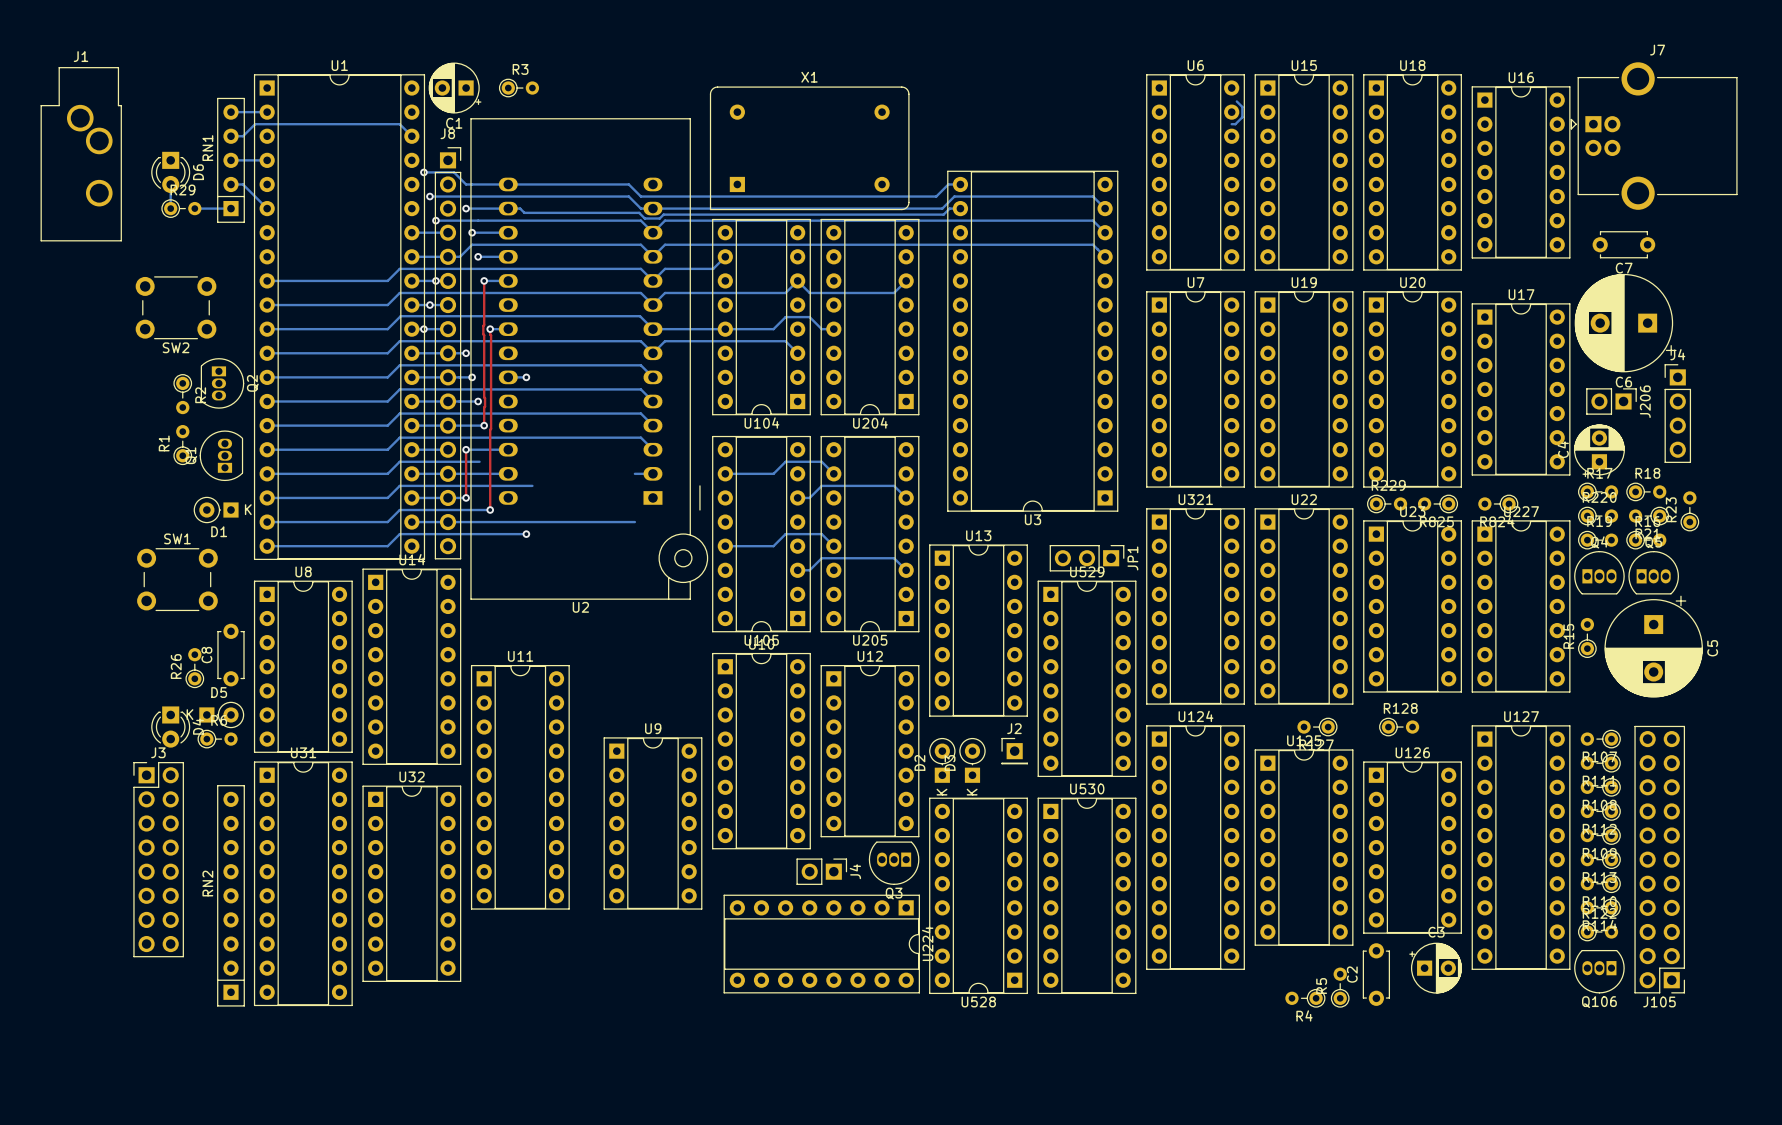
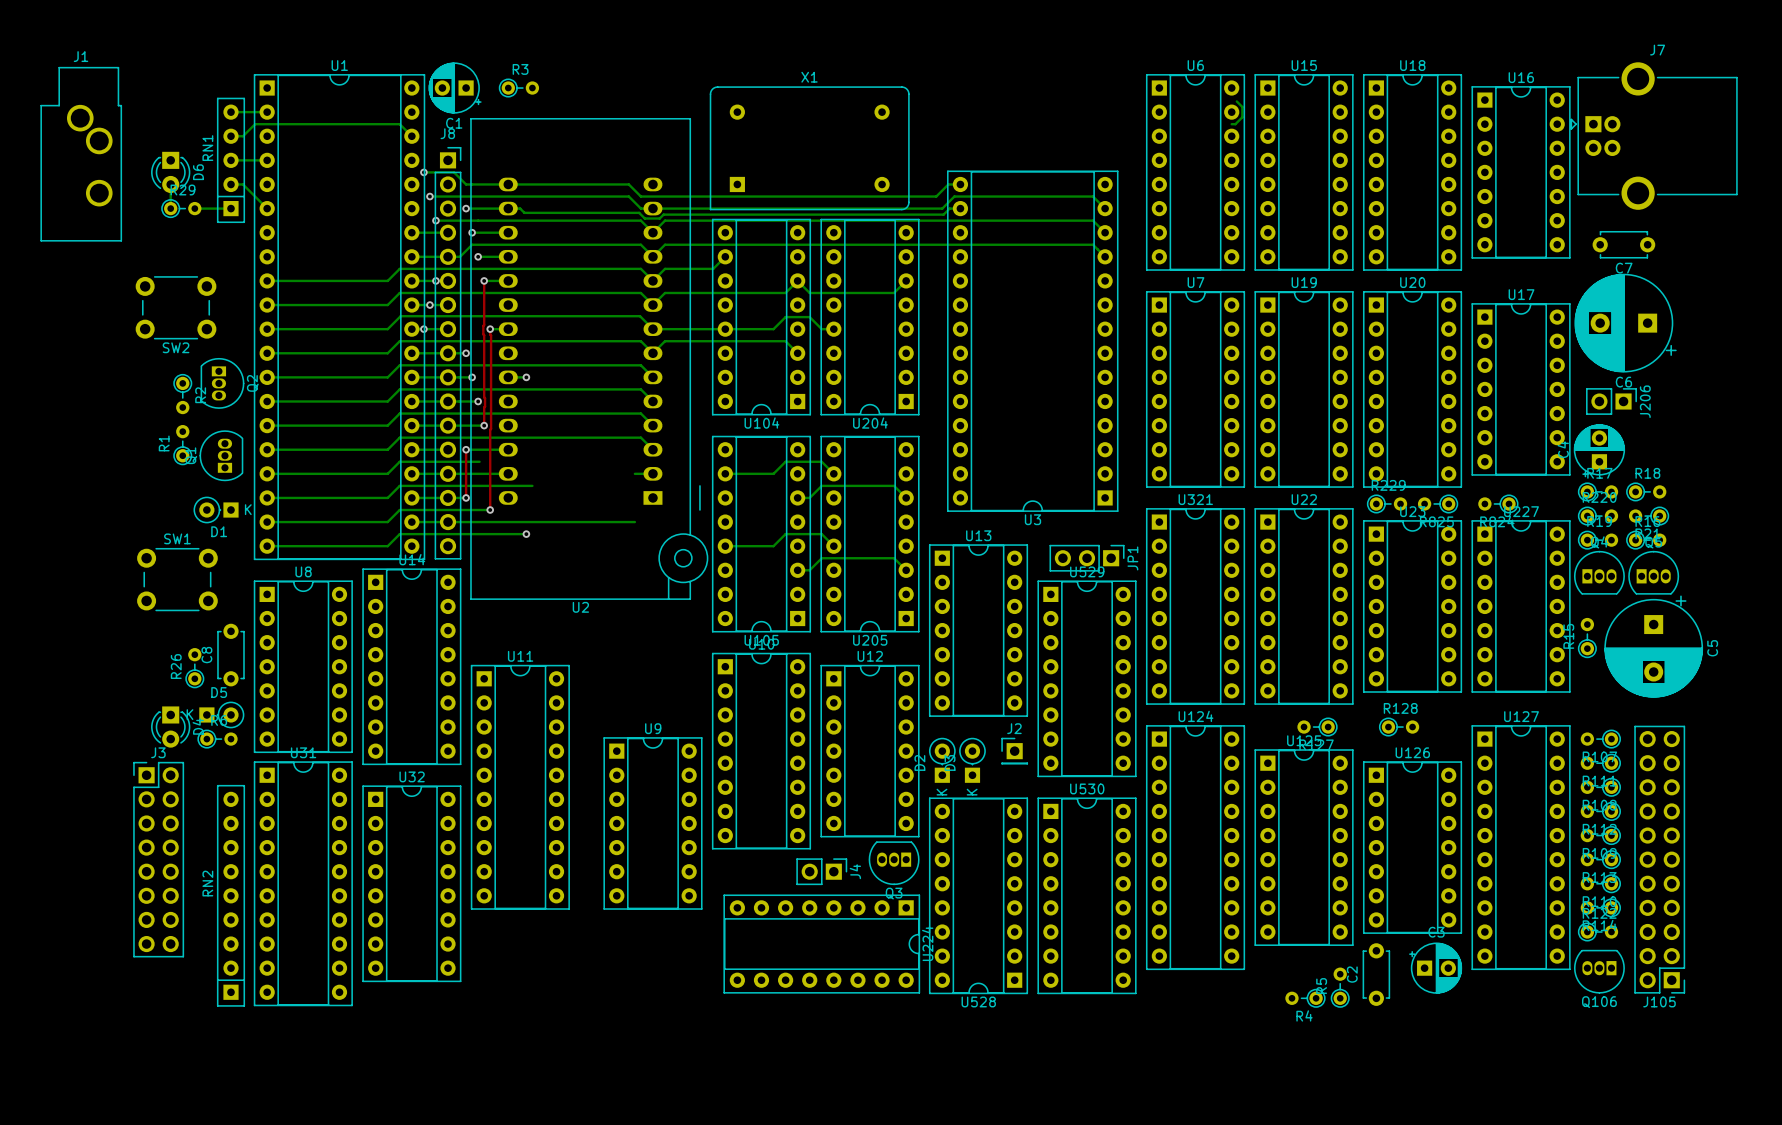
J4: (1677, 413) -> none
R23: (1689, 511) -> none

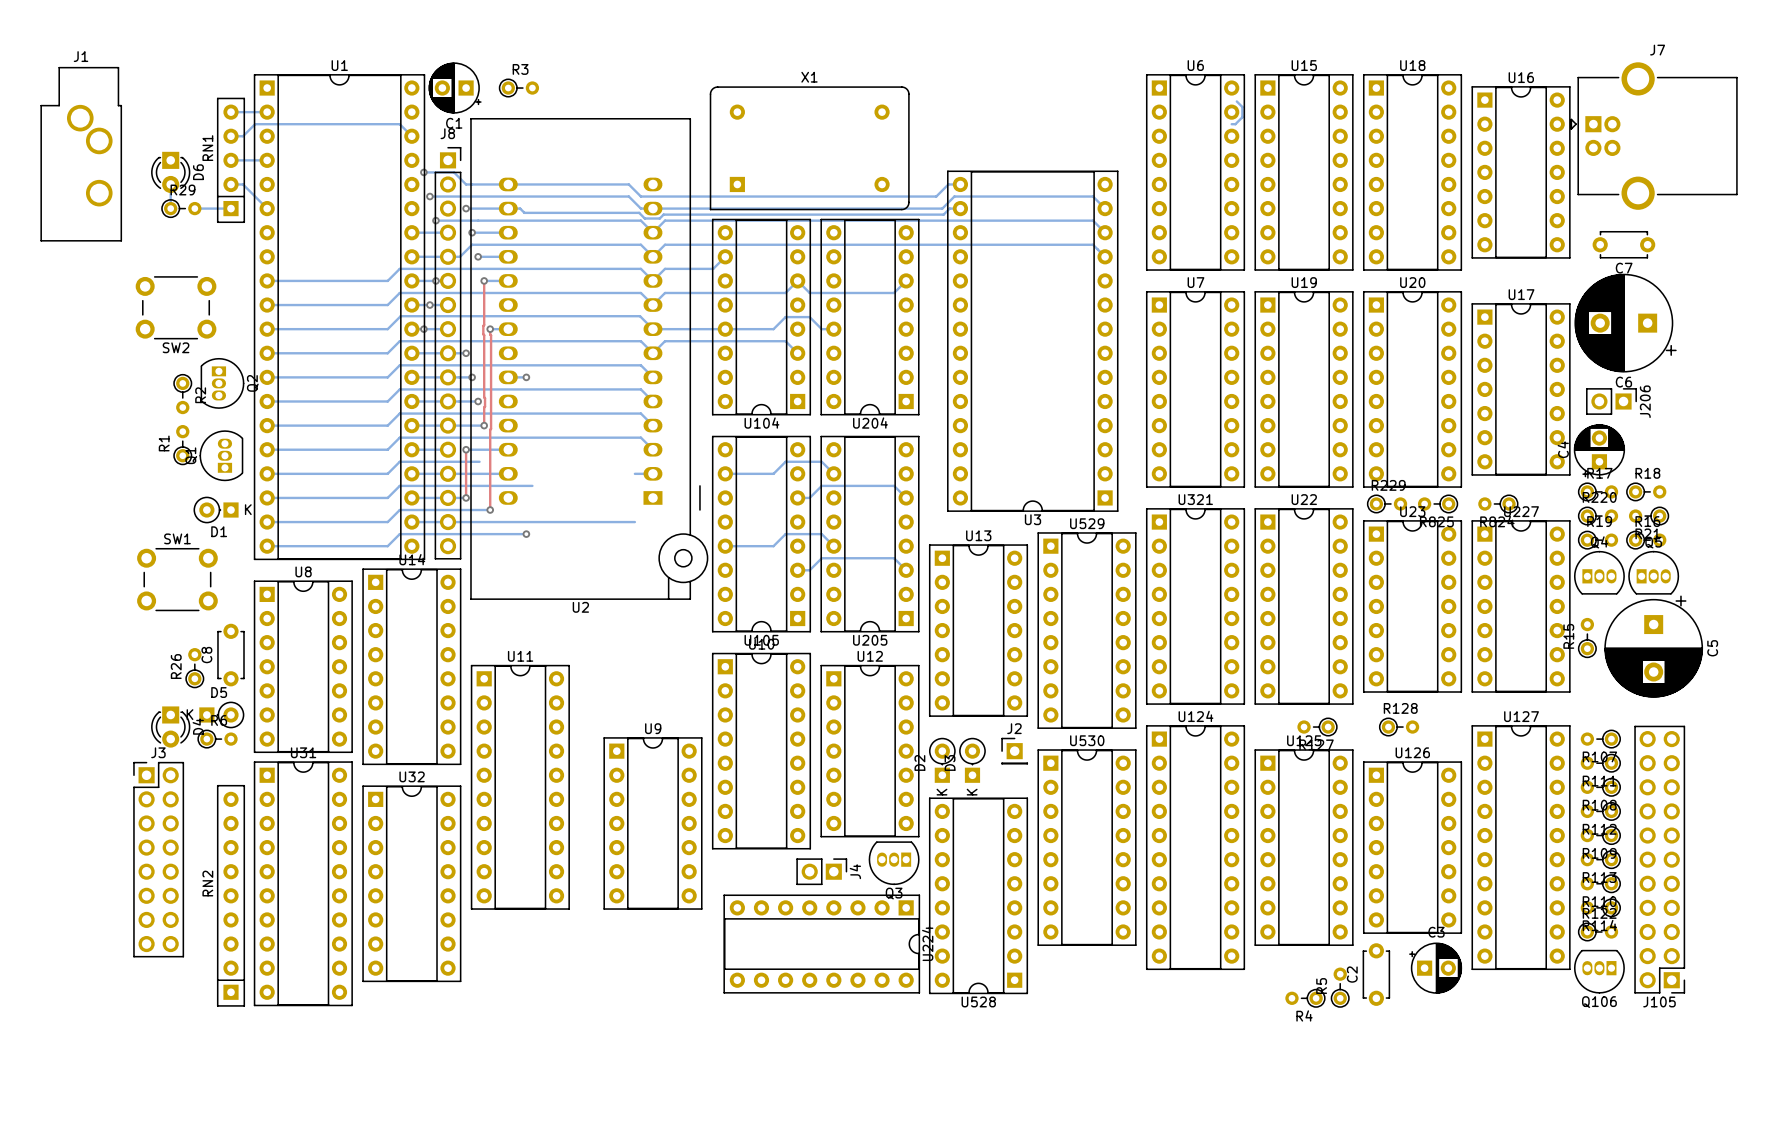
JP1: (1087, 558) -> none
U529 position: (1087, 678) -> (1087, 630)
U530 position: (1087, 895) -> (1087, 847)

